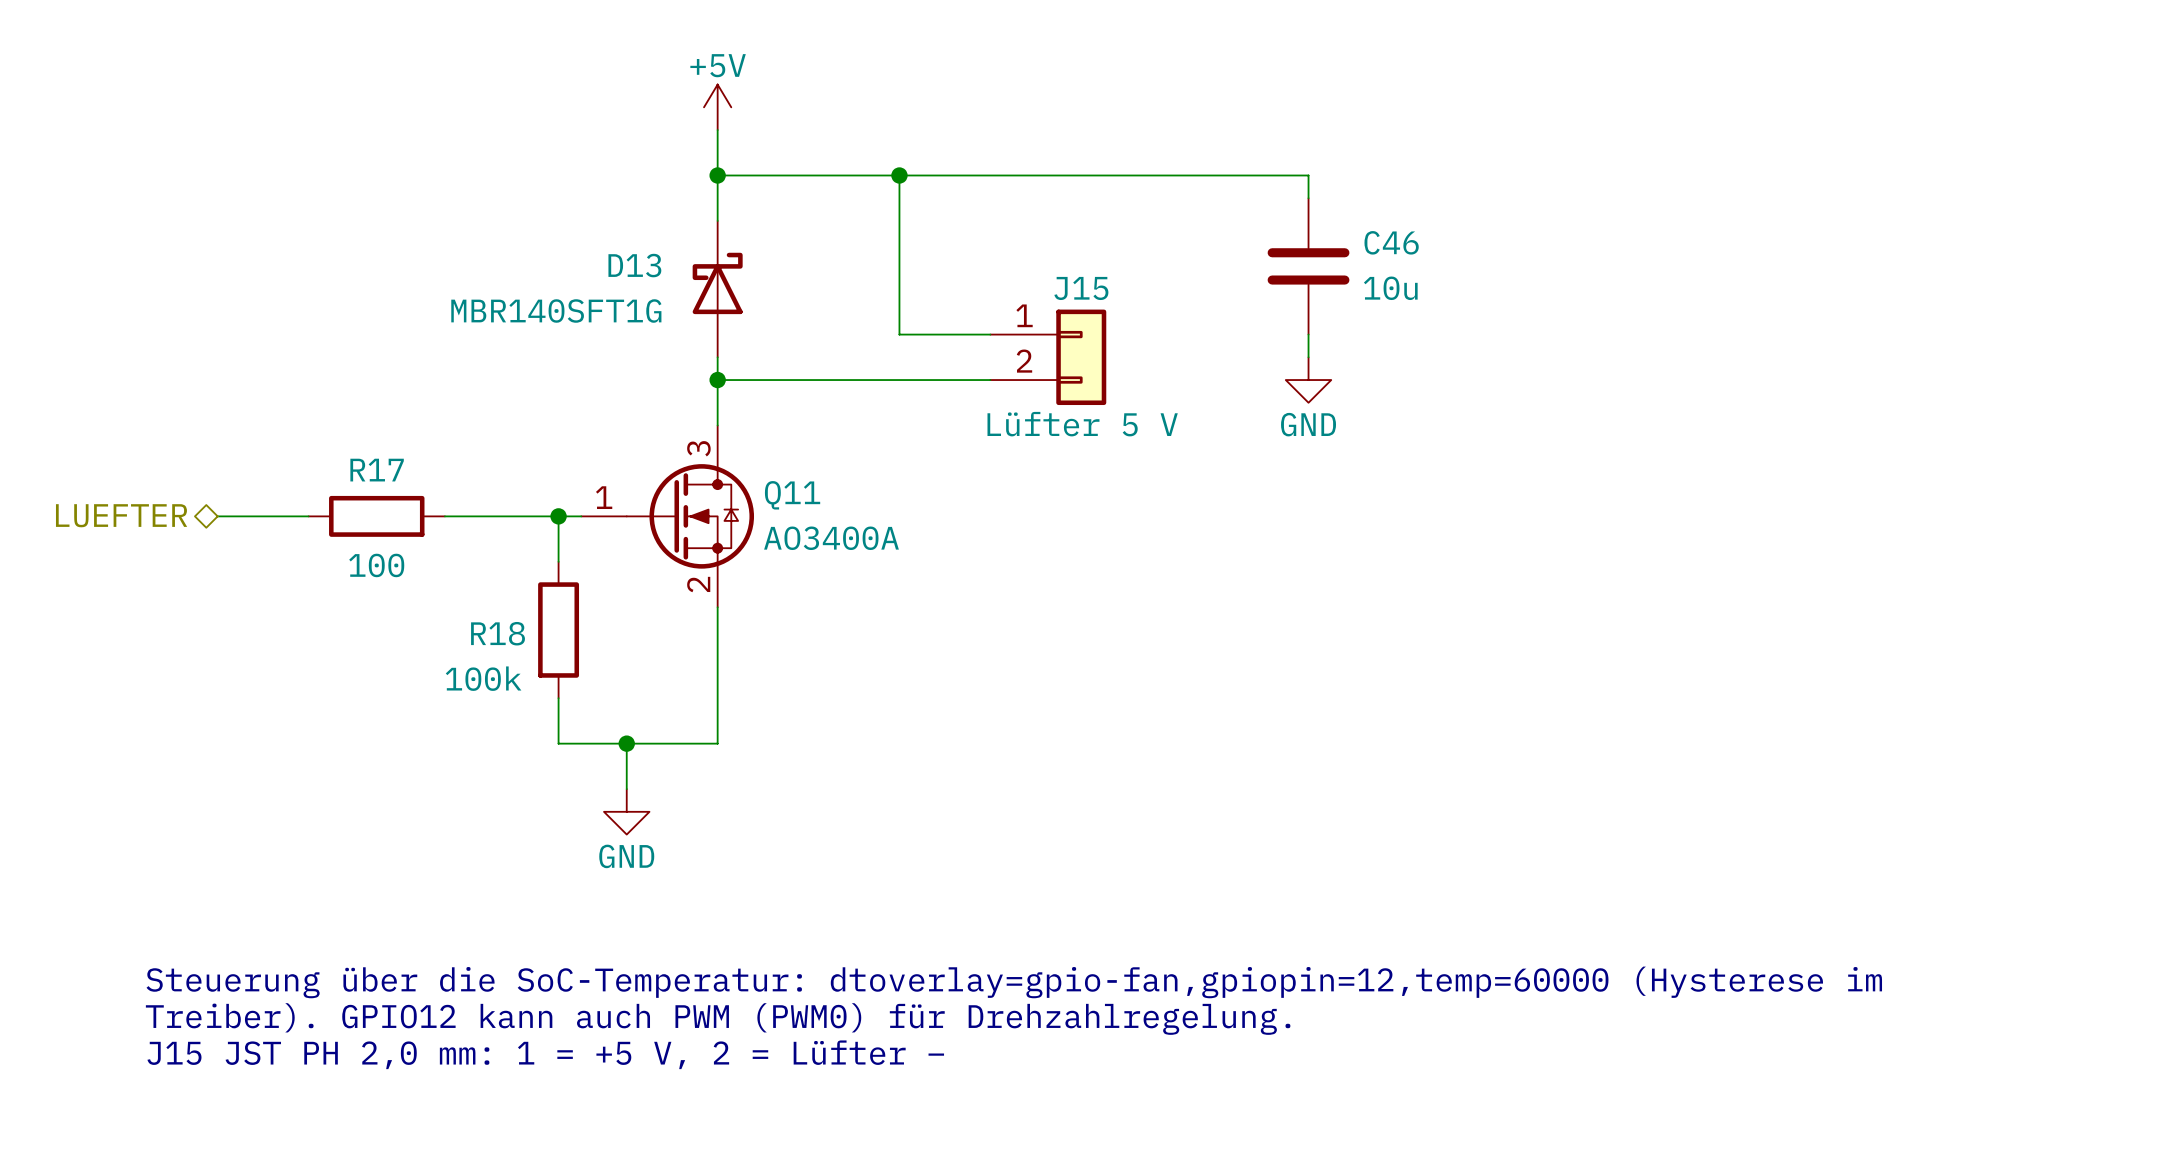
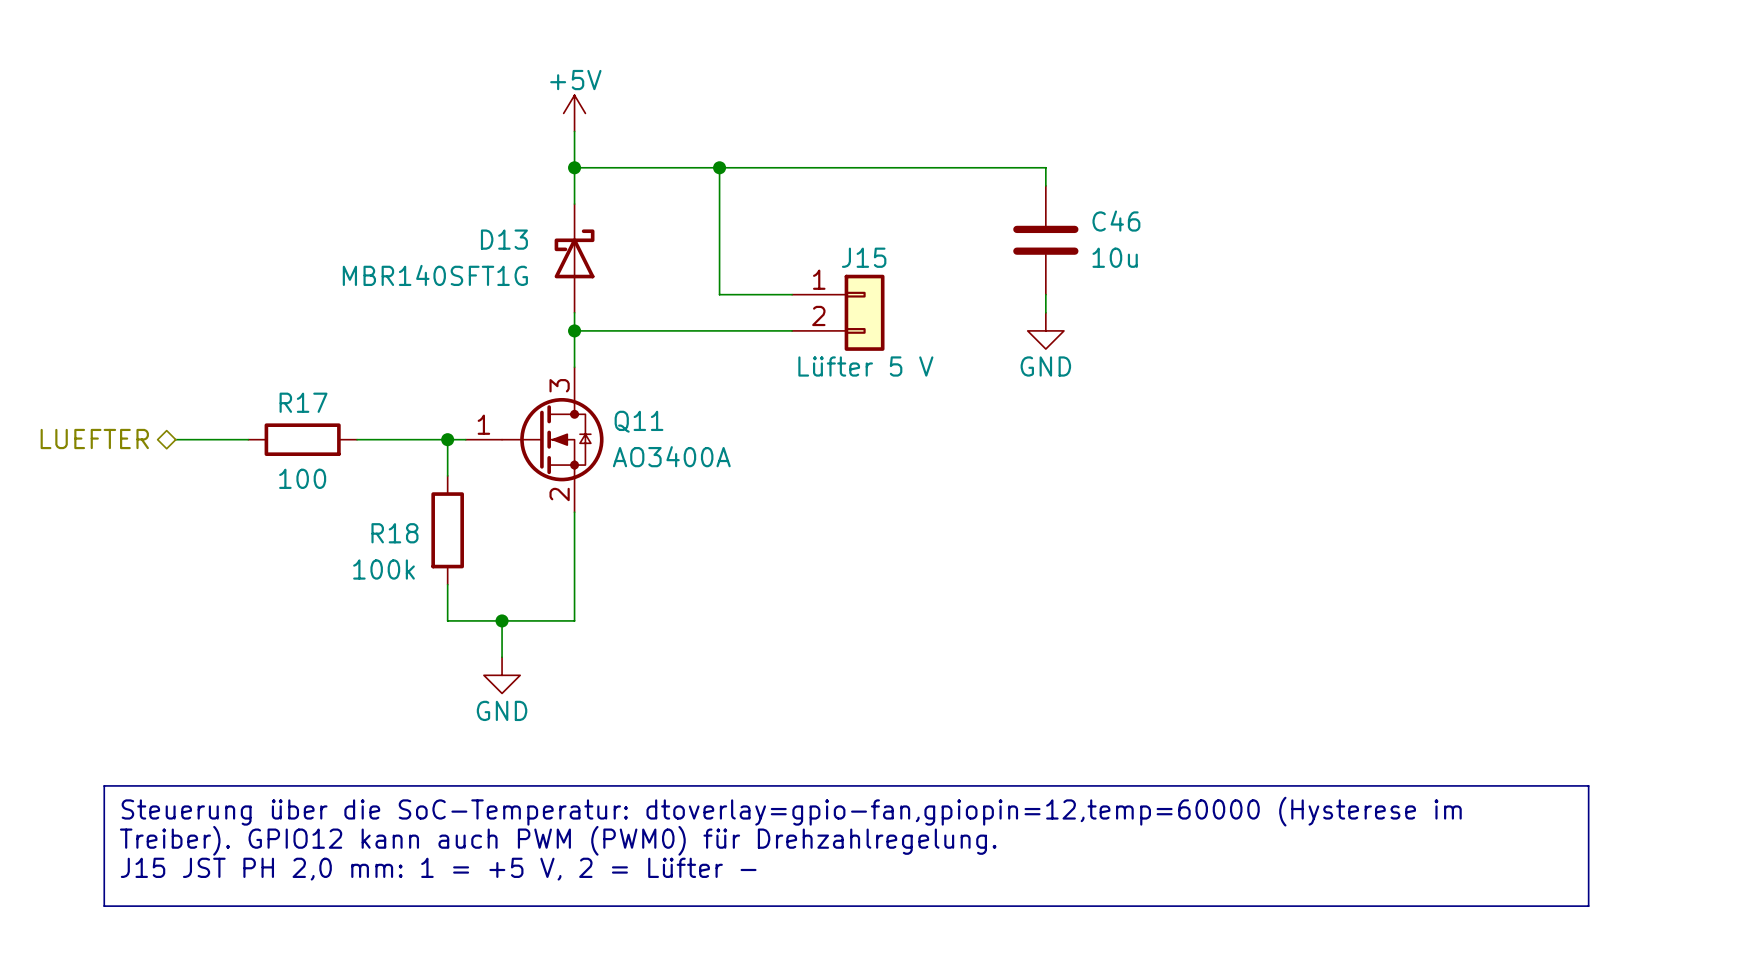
line: none -> (104, 785) (1588, 785) (1588, 906) (104, 906) (104, 785)

